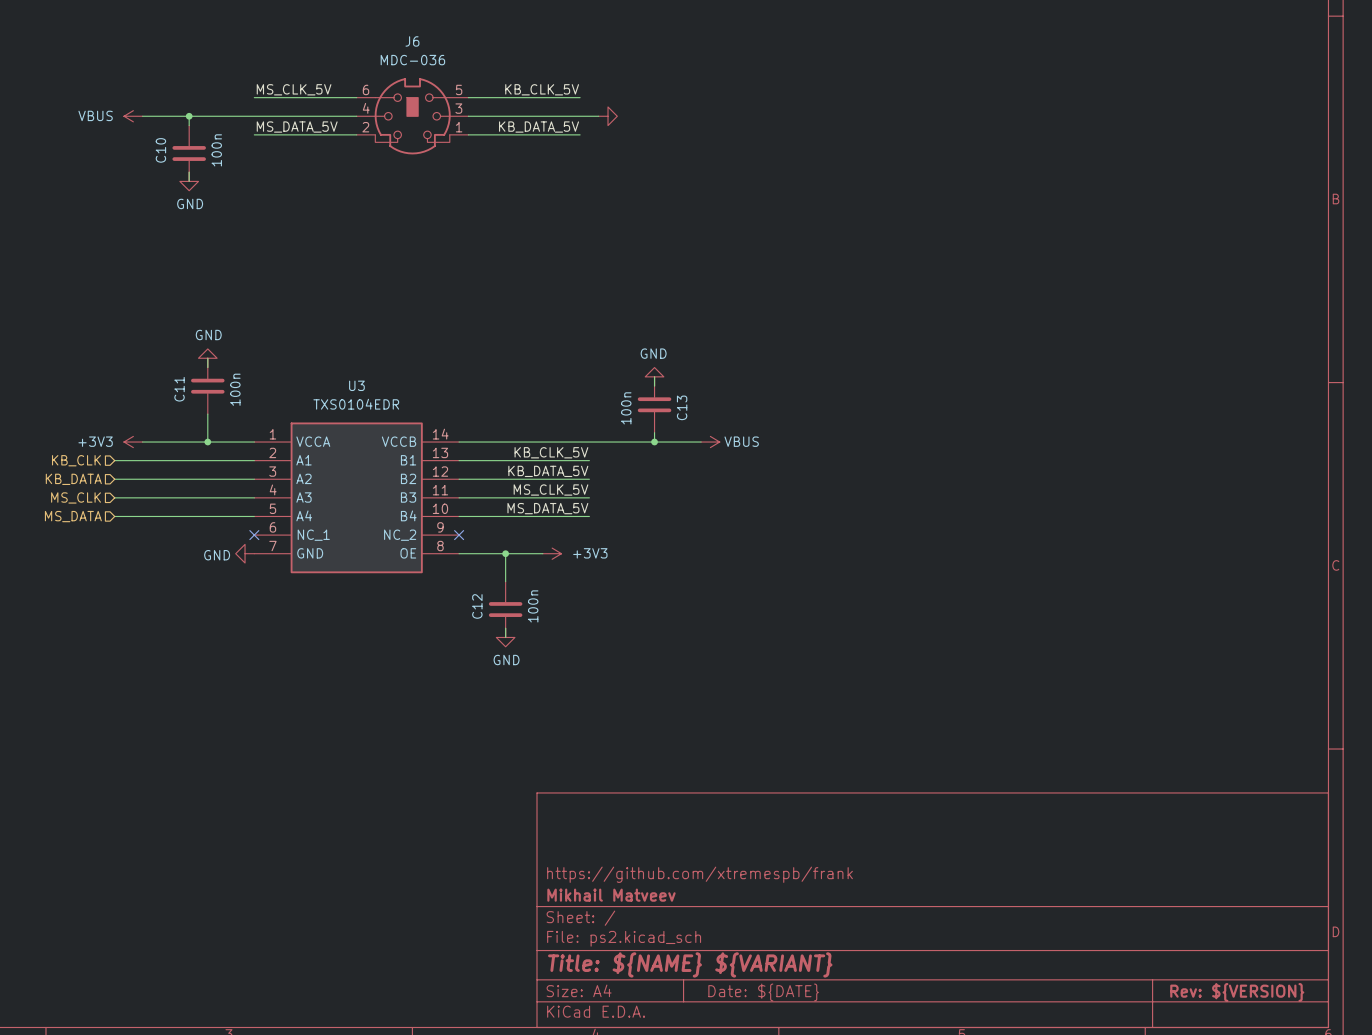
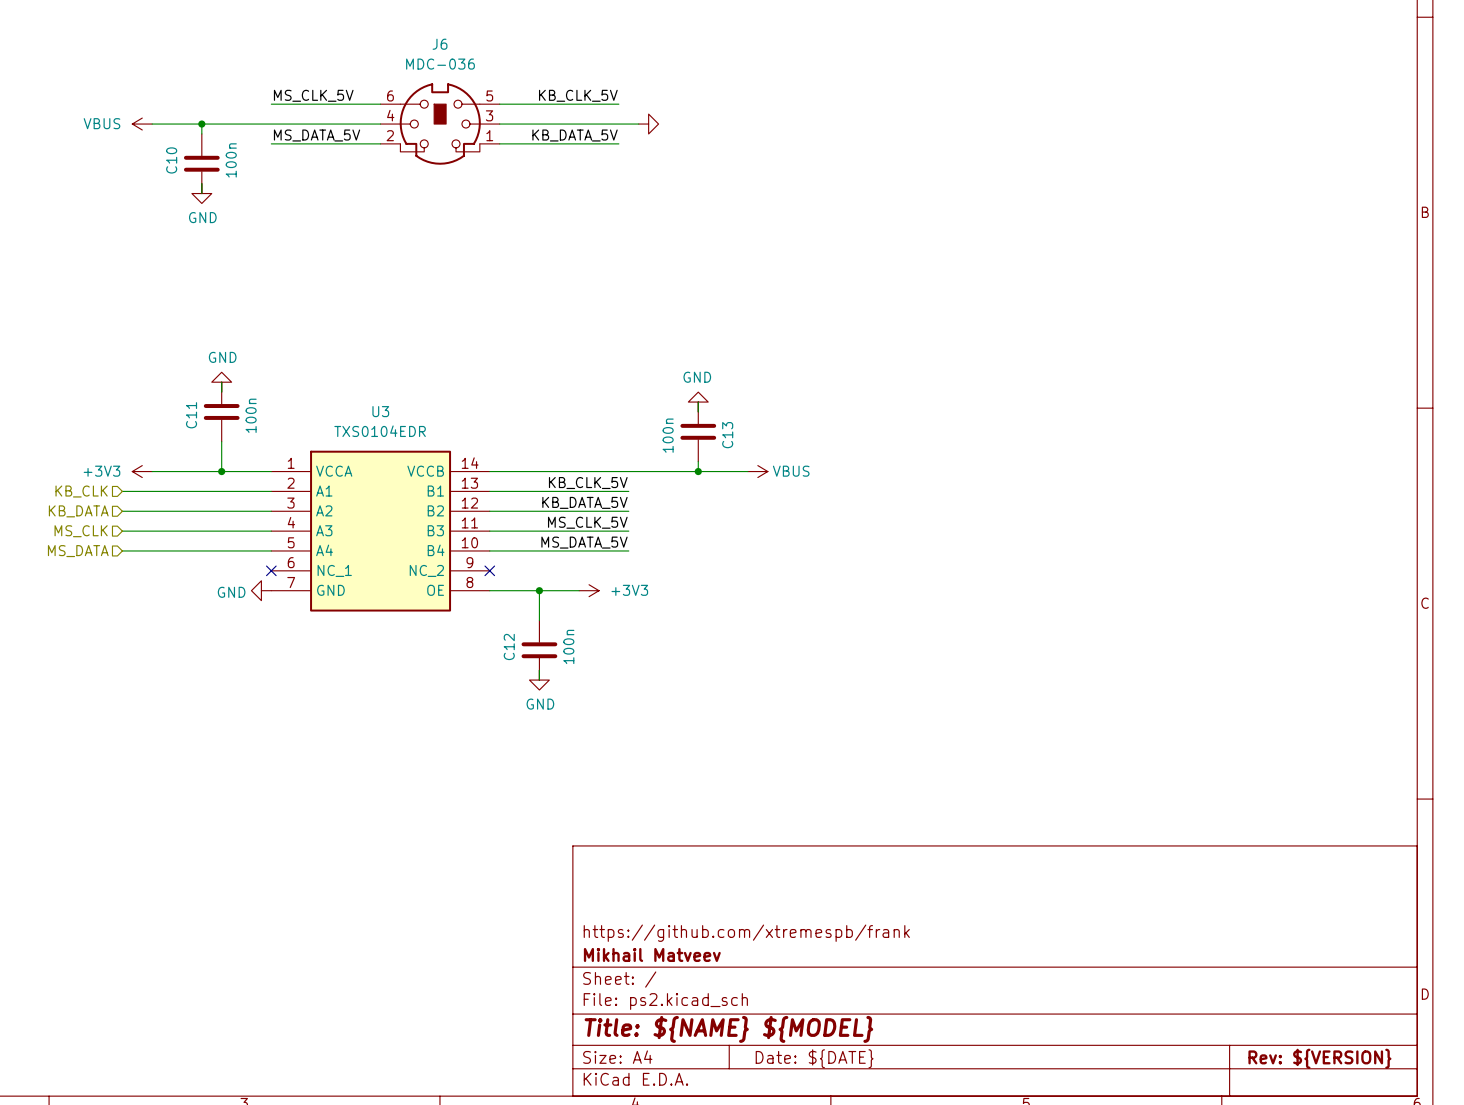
title block: Title: ${NAME} ${VARIANT} (690, 964) -> Title: ${NAME} ${MODEL} (728, 1029)

